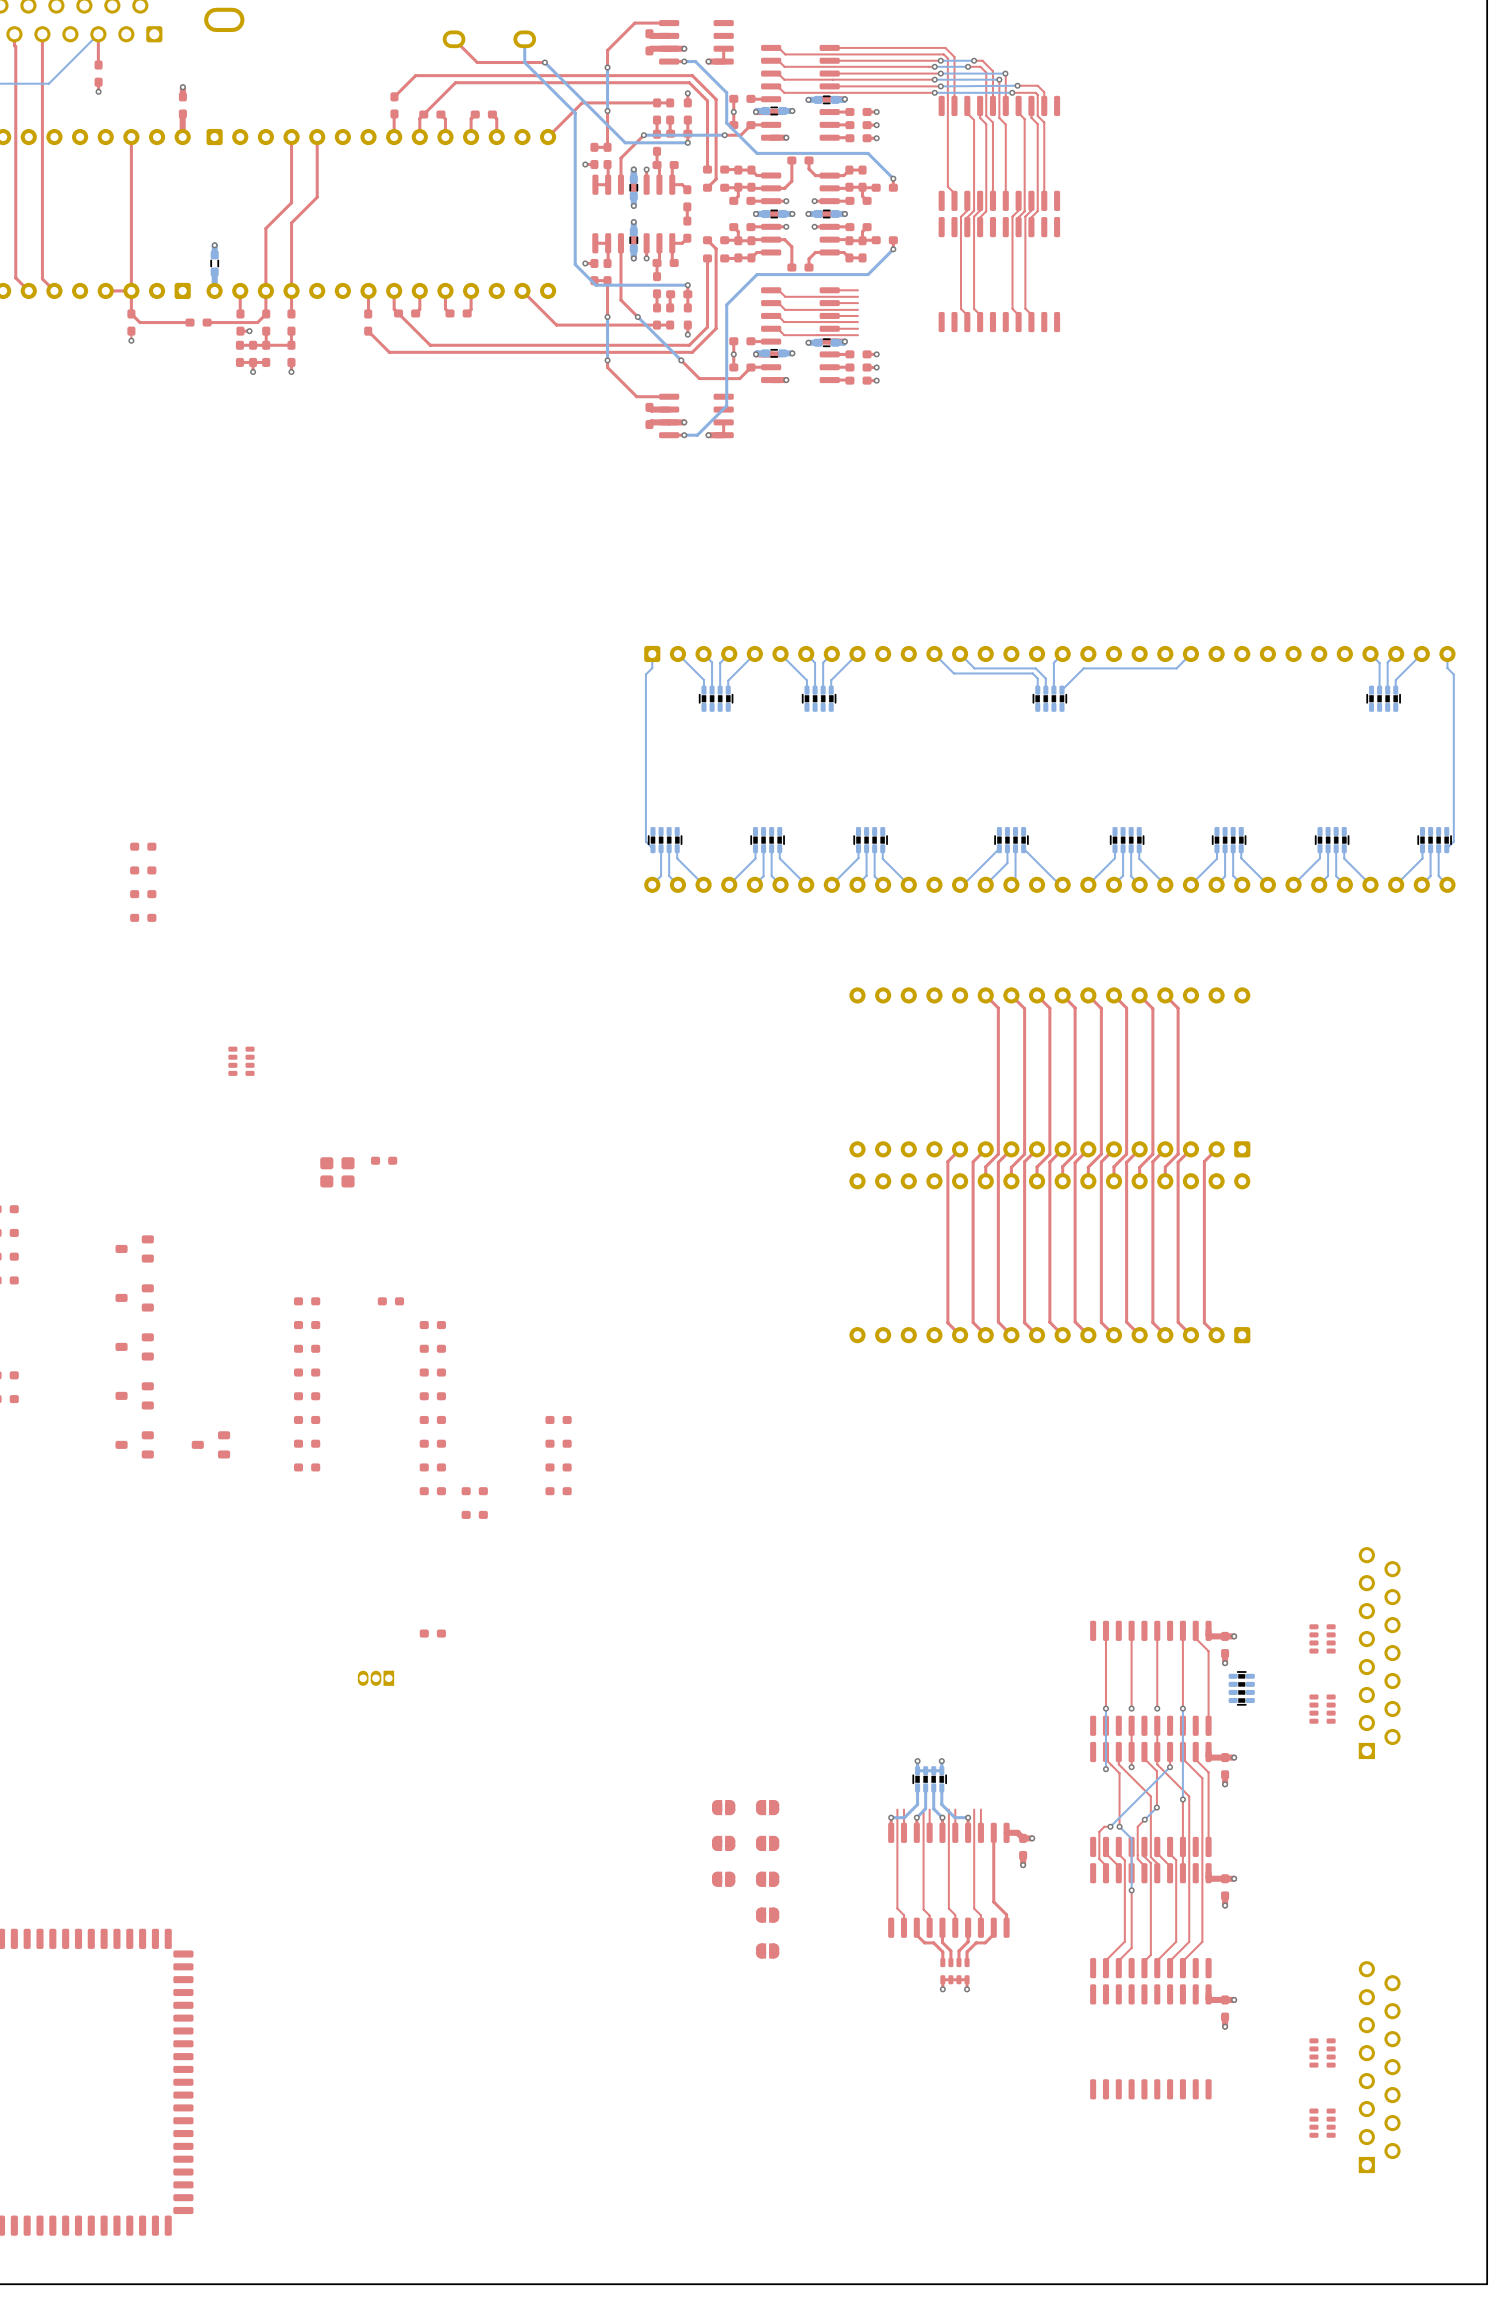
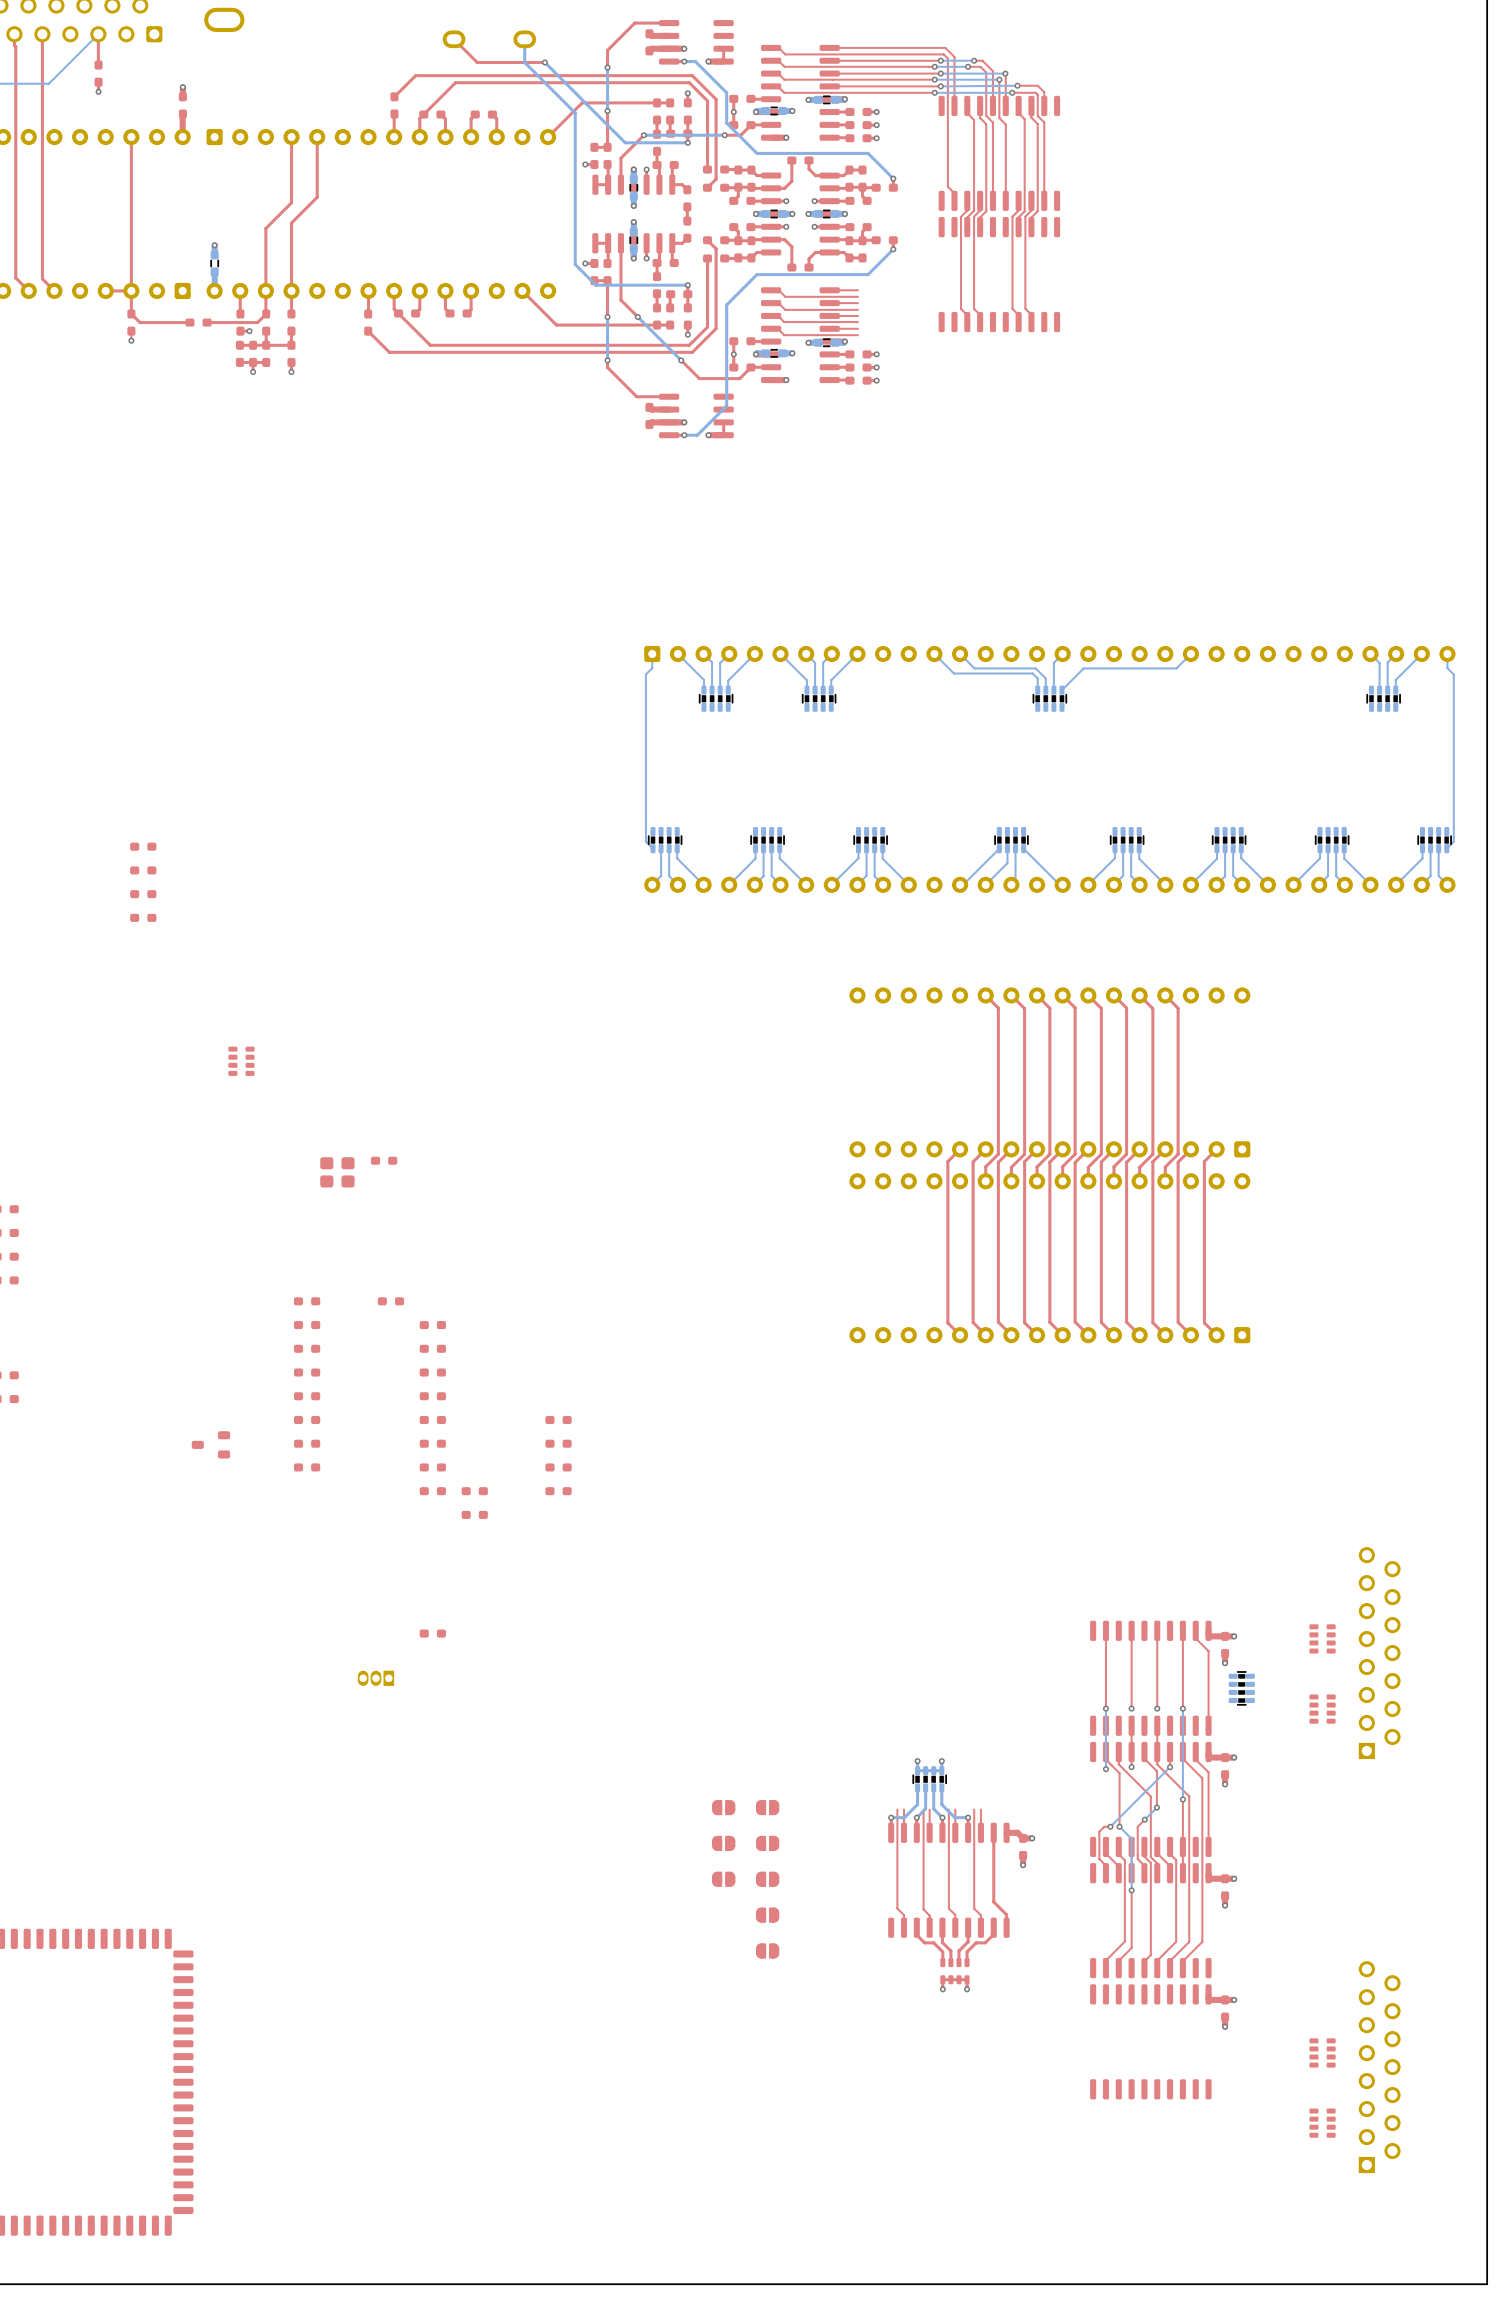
part: (134, 1248) -> none
part: (134, 1297) -> none
part: (134, 1346) -> none
part: (134, 1395) -> none
part: (134, 1444) -> none

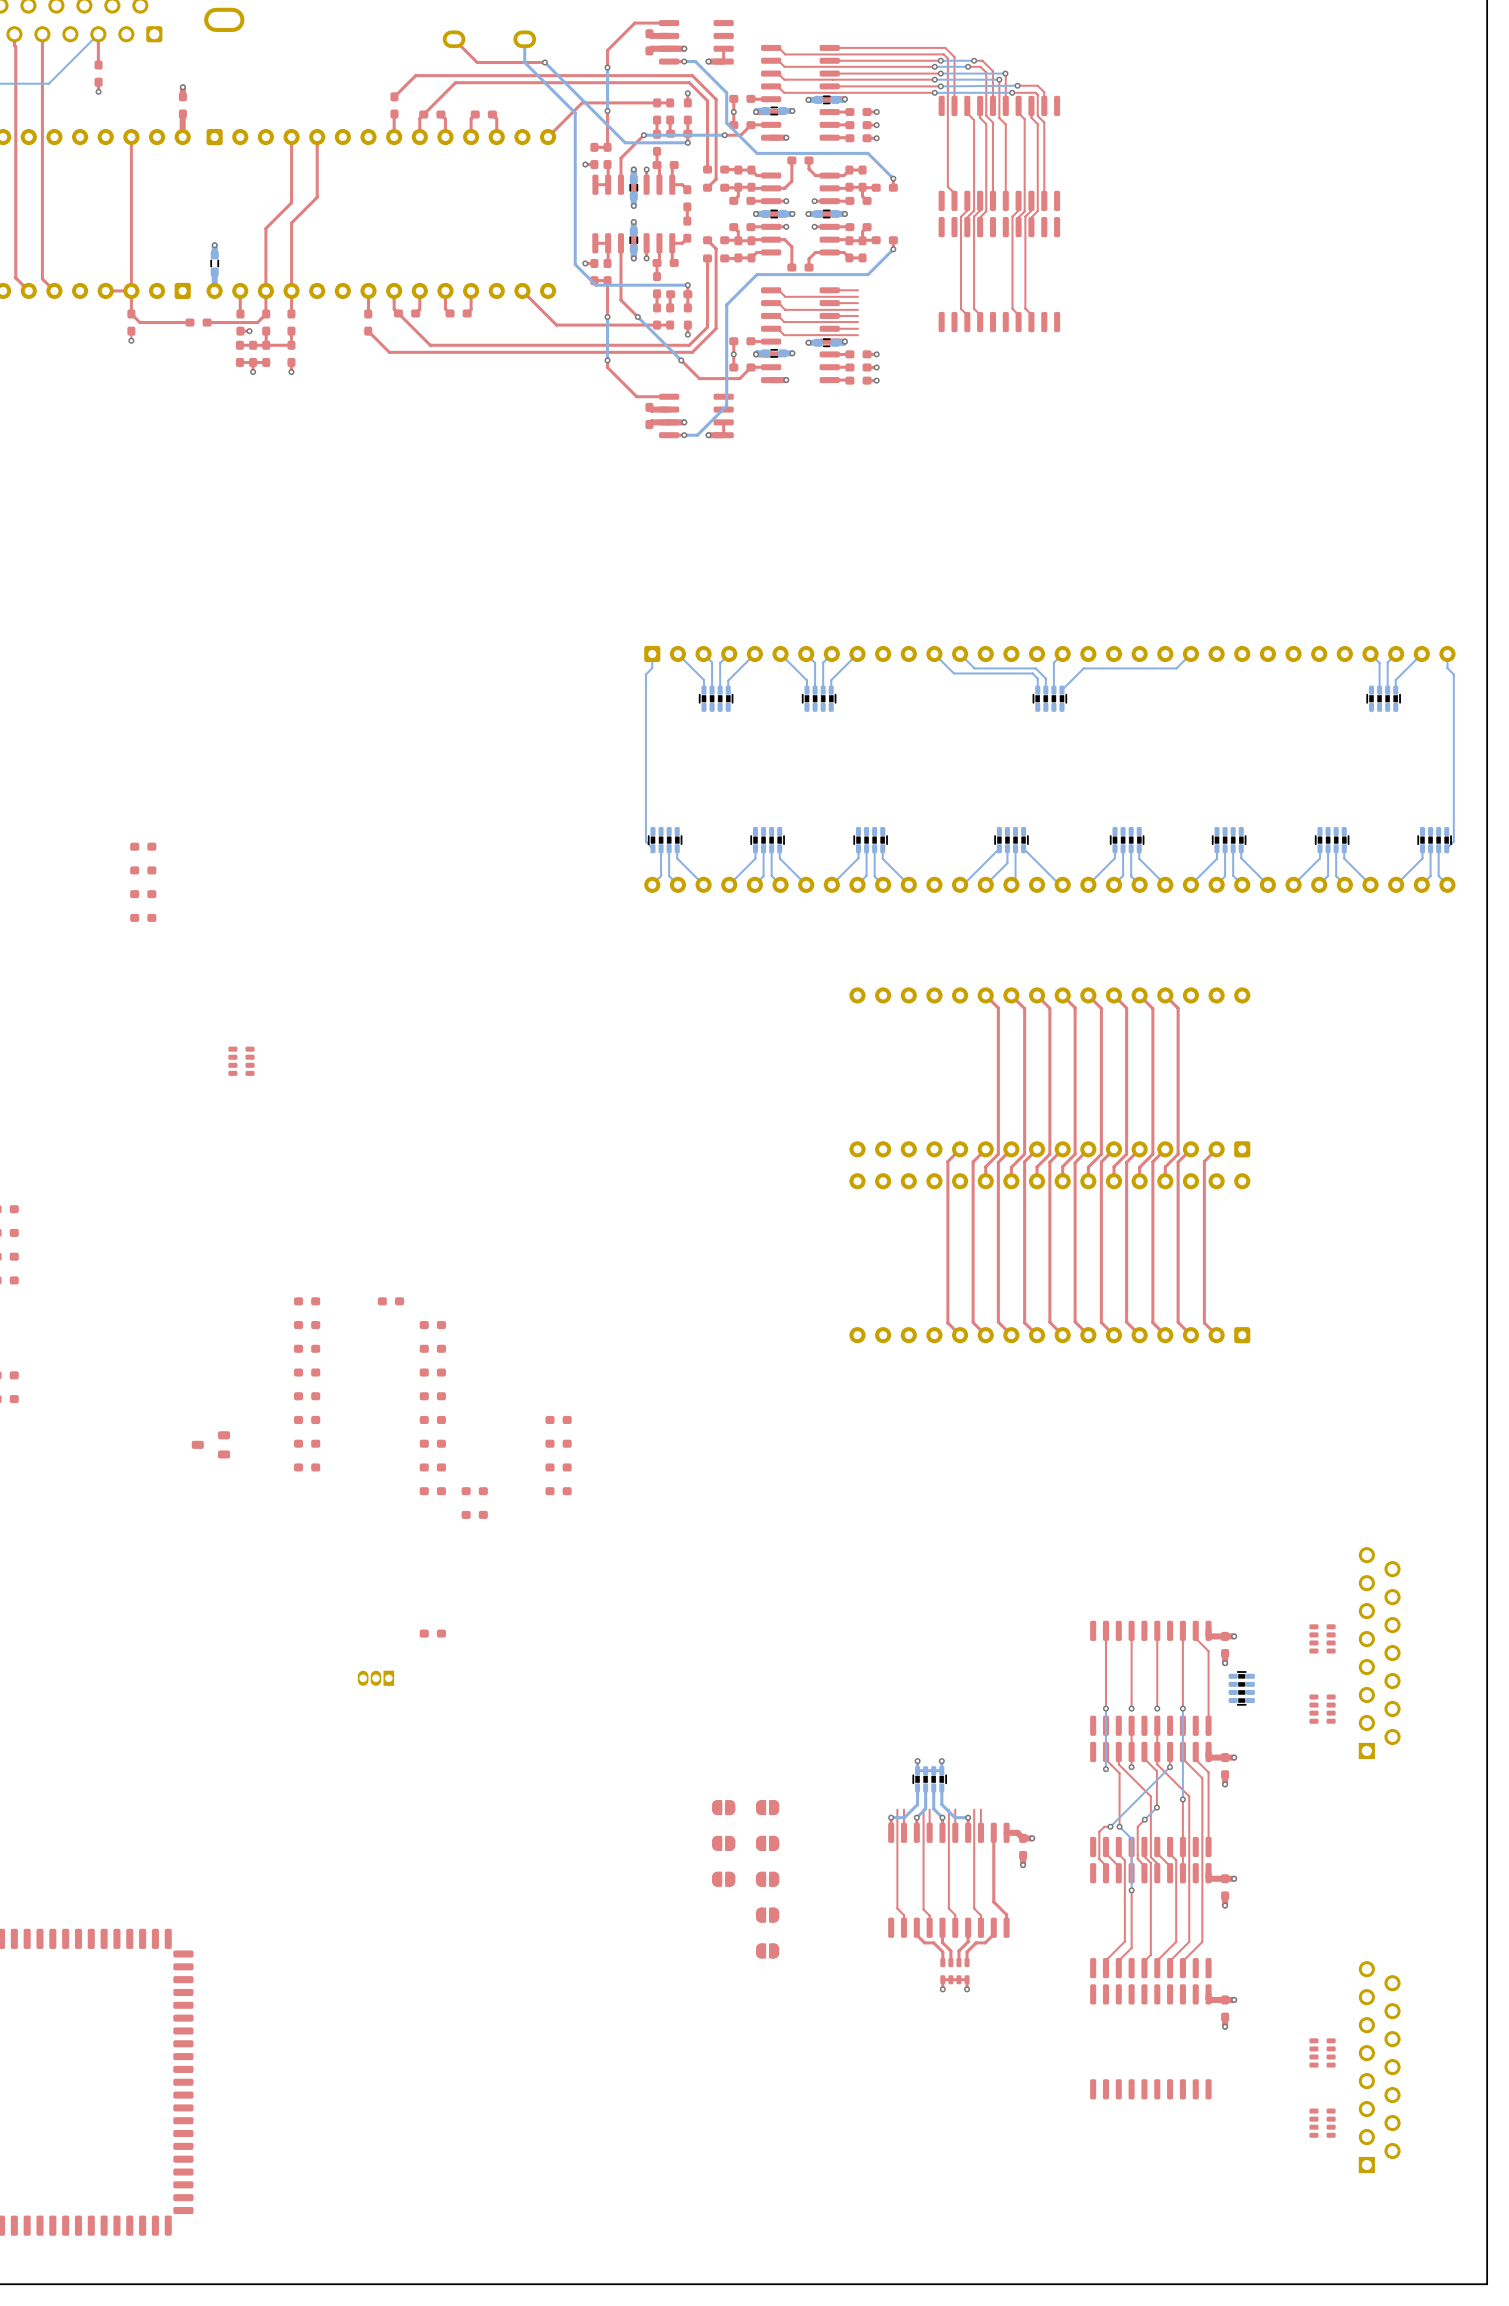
part: (384, 1160) -> none
part: (337, 1172) -> none

